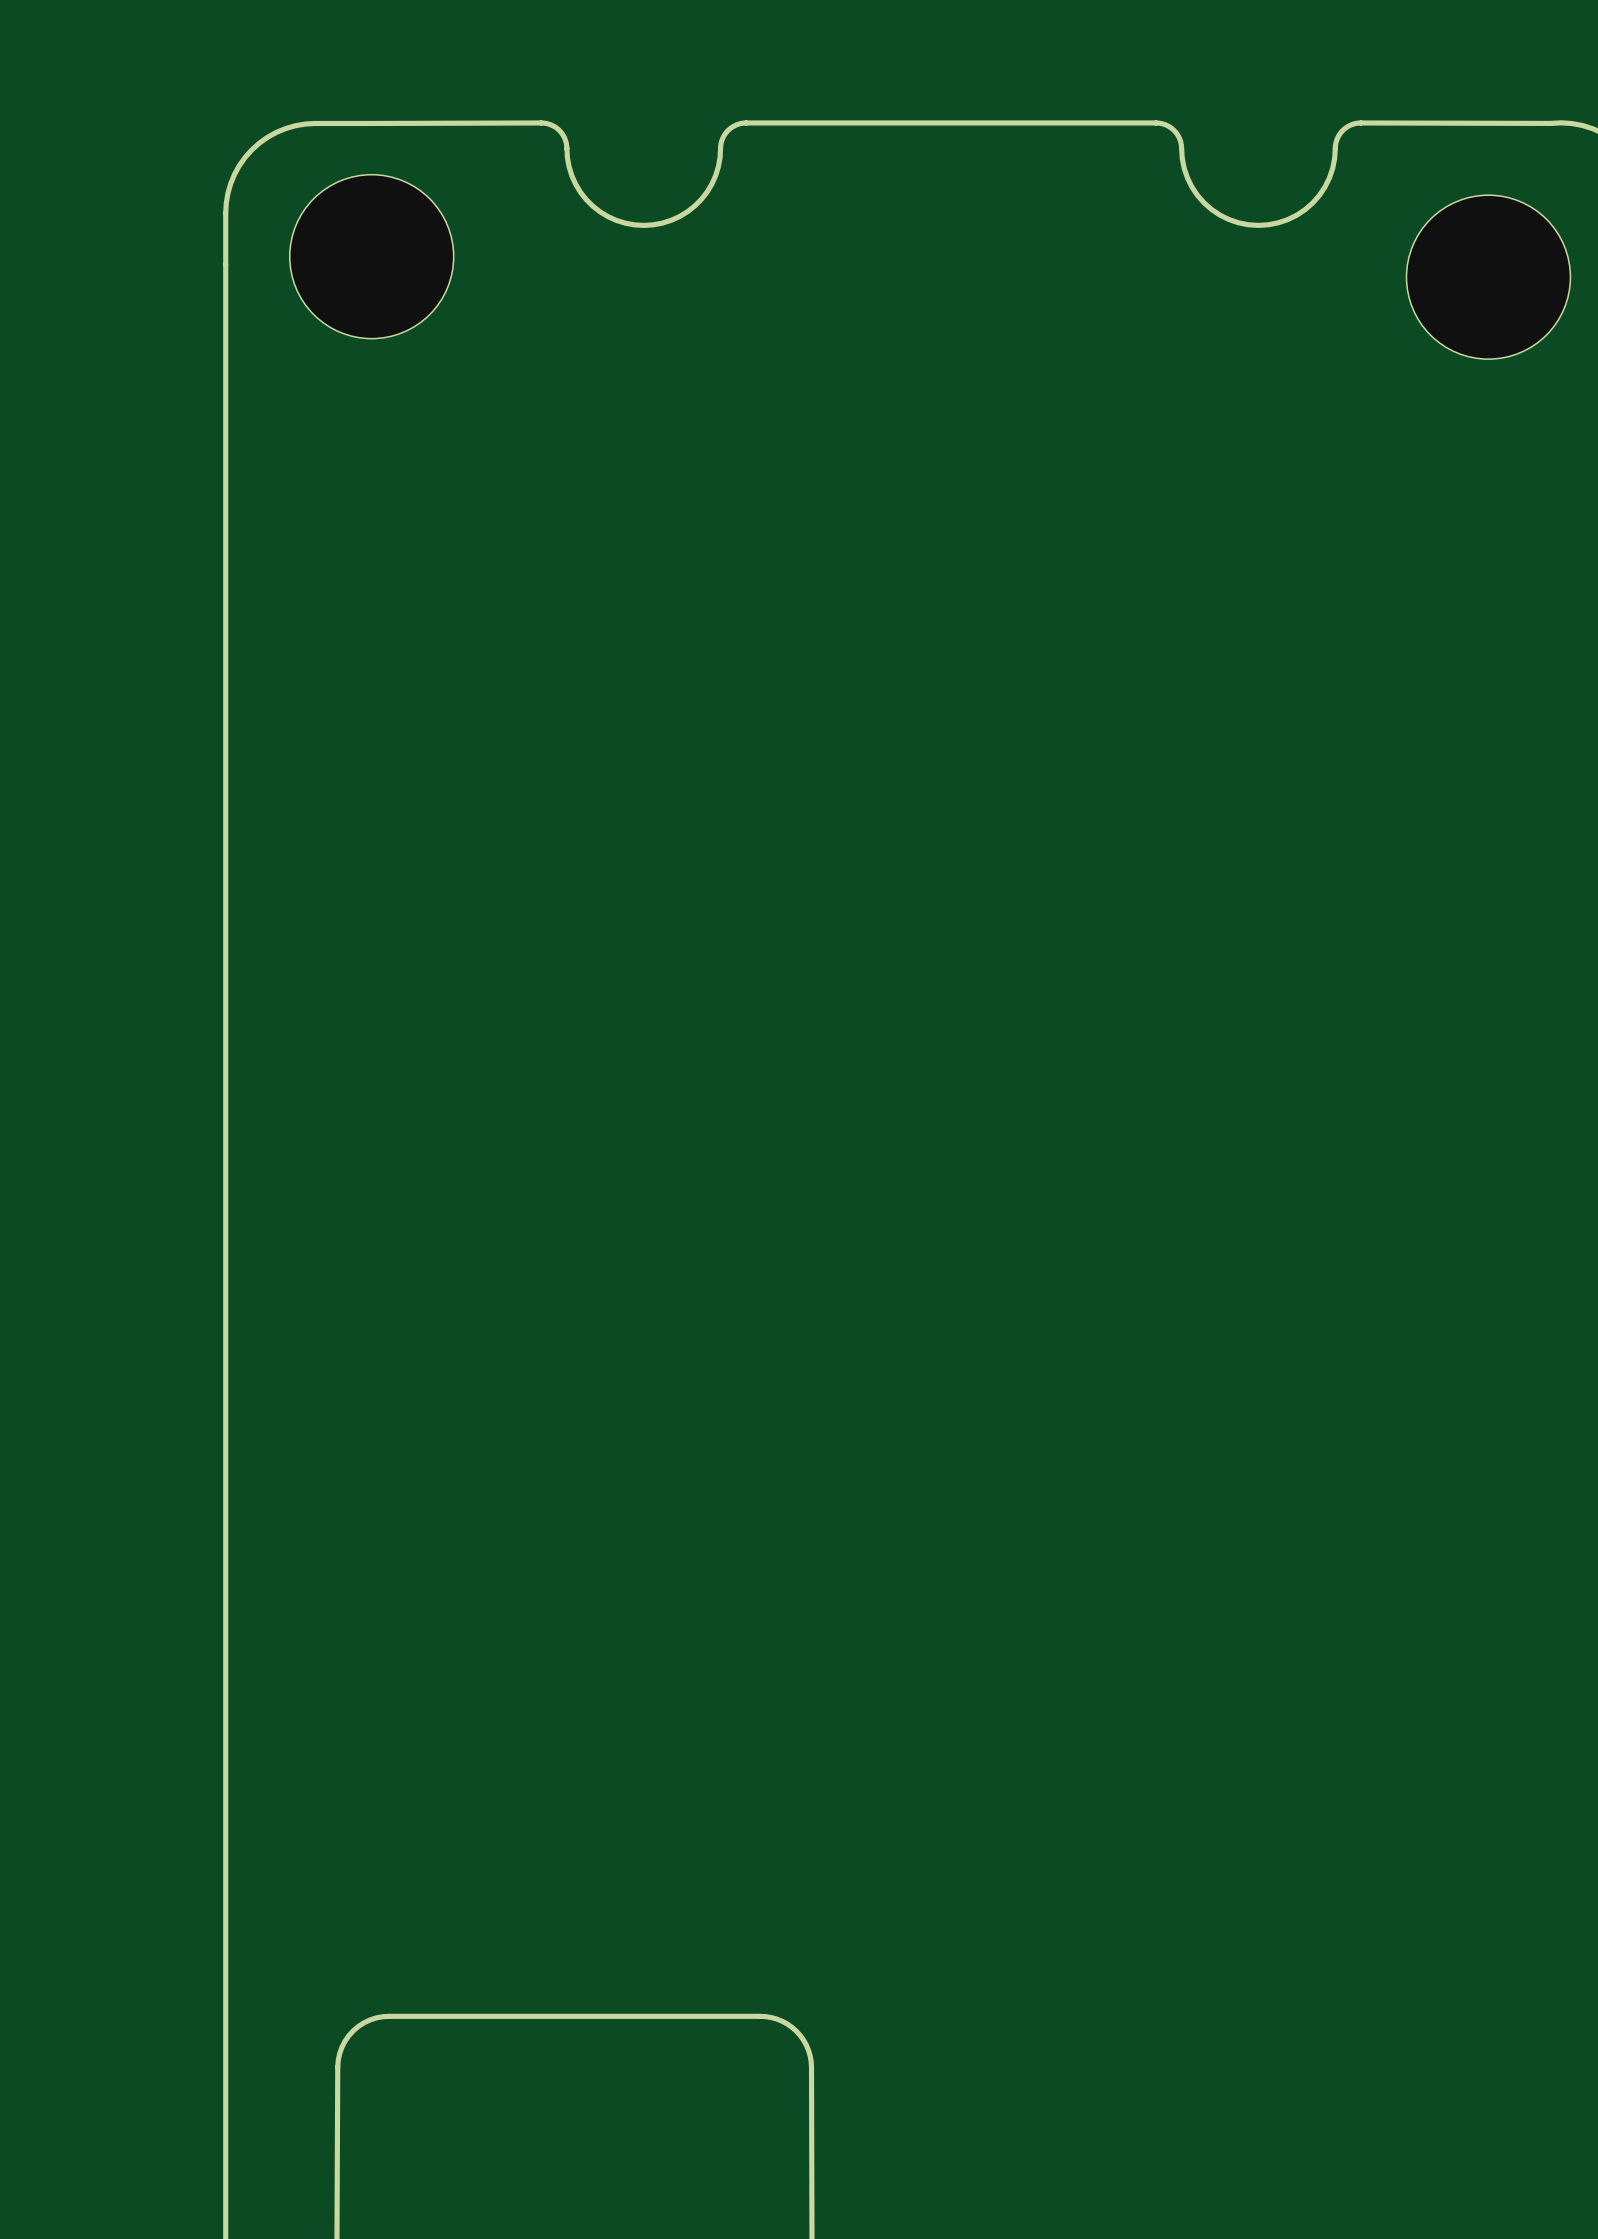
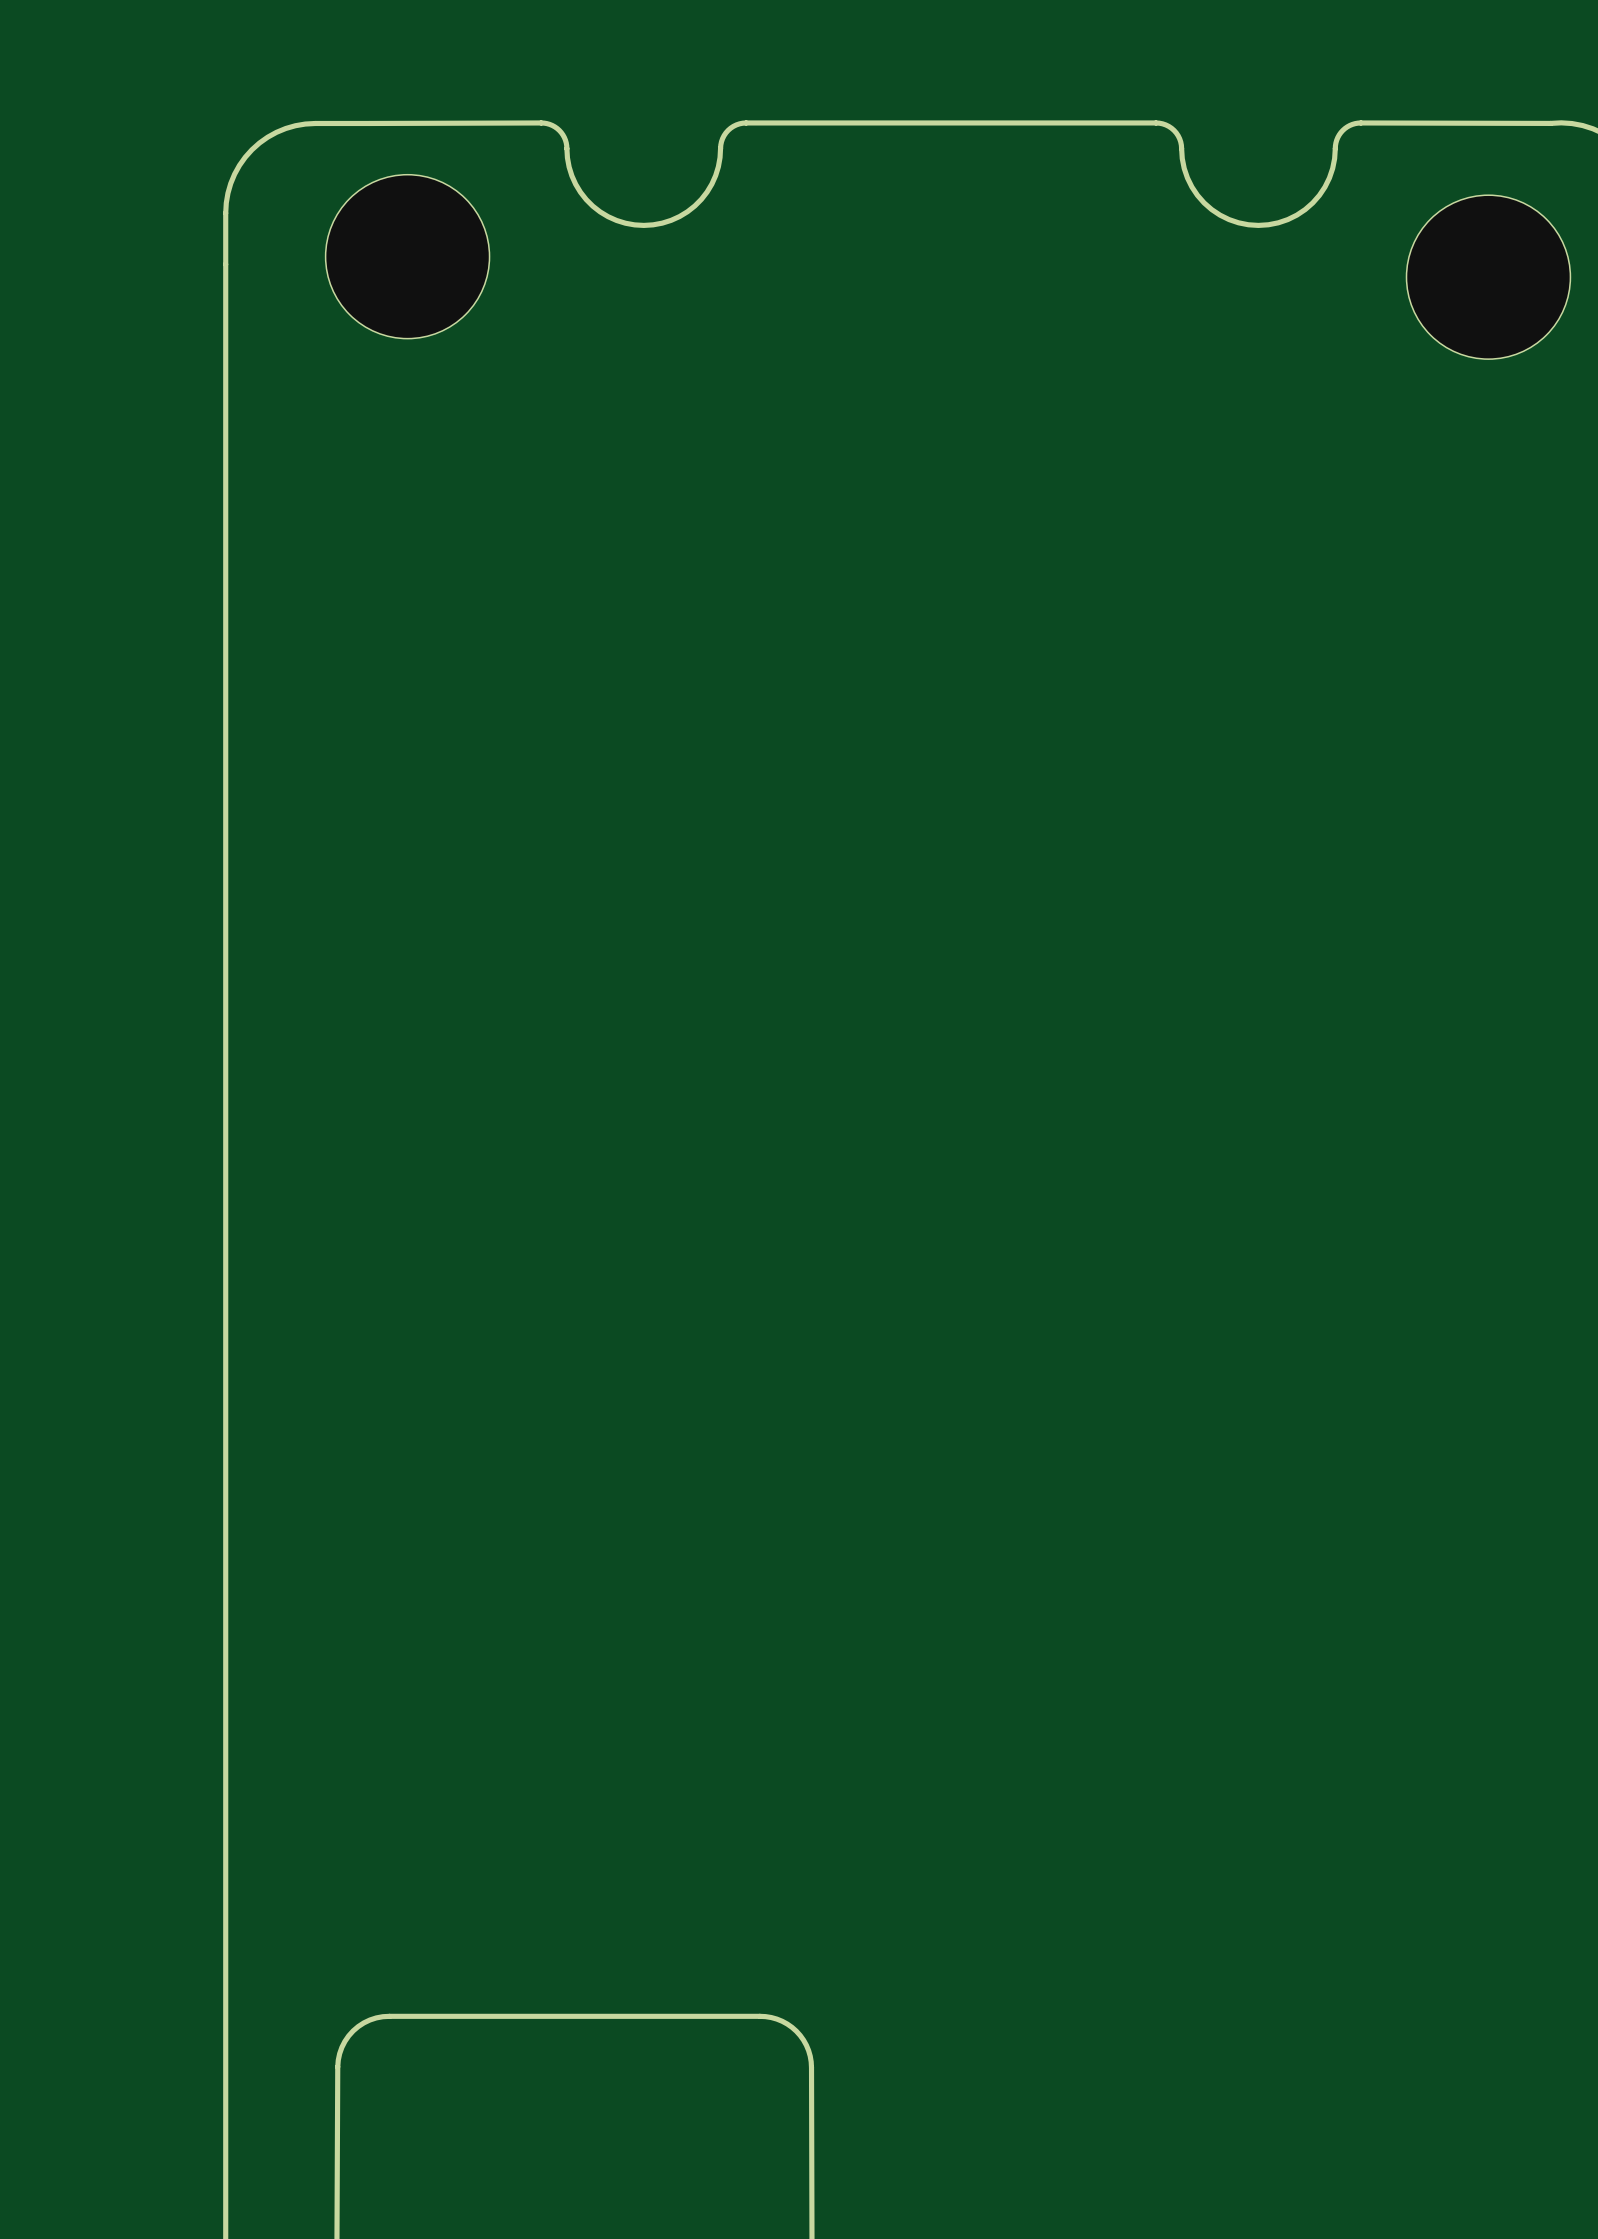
part position: (371, 256) -> (407, 256)

